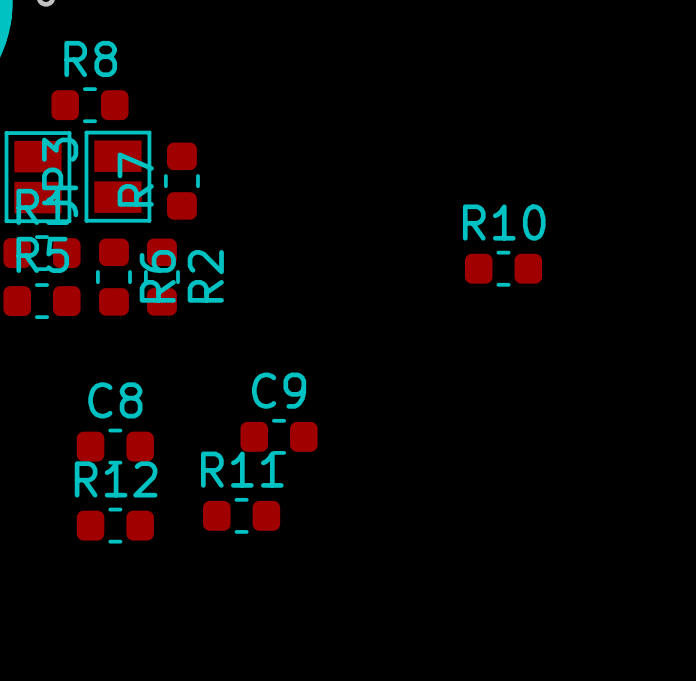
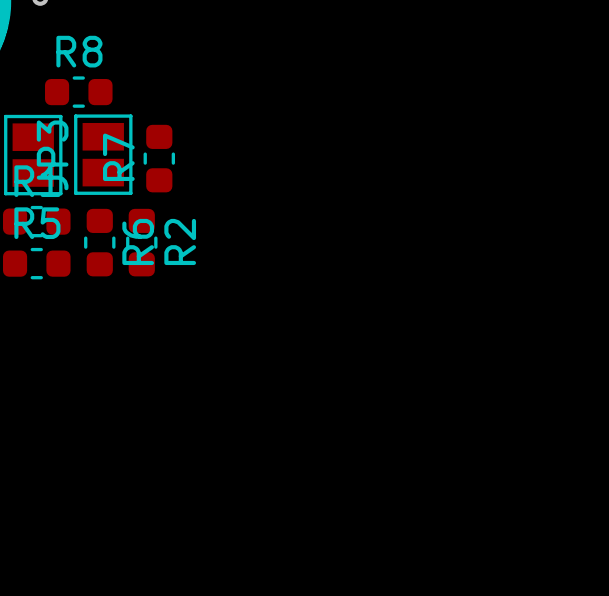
R10: (503, 268) -> none
C9: (279, 436) -> none
C8: (115, 446) -> none
R11: (241, 515) -> none
R12: (115, 525) -> none

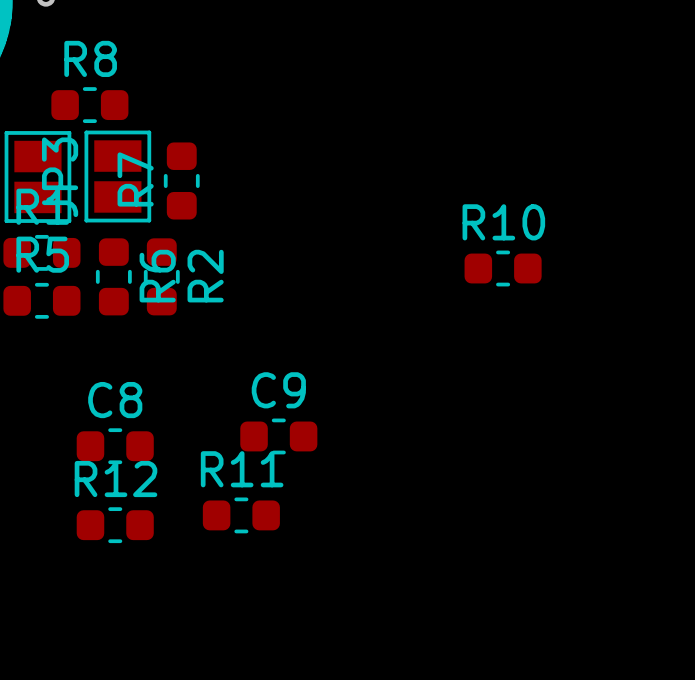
R10: none -> (503, 268)
C9: none -> (278, 436)
C8: none -> (115, 446)
R11: none -> (241, 515)
R12: none -> (115, 525)

